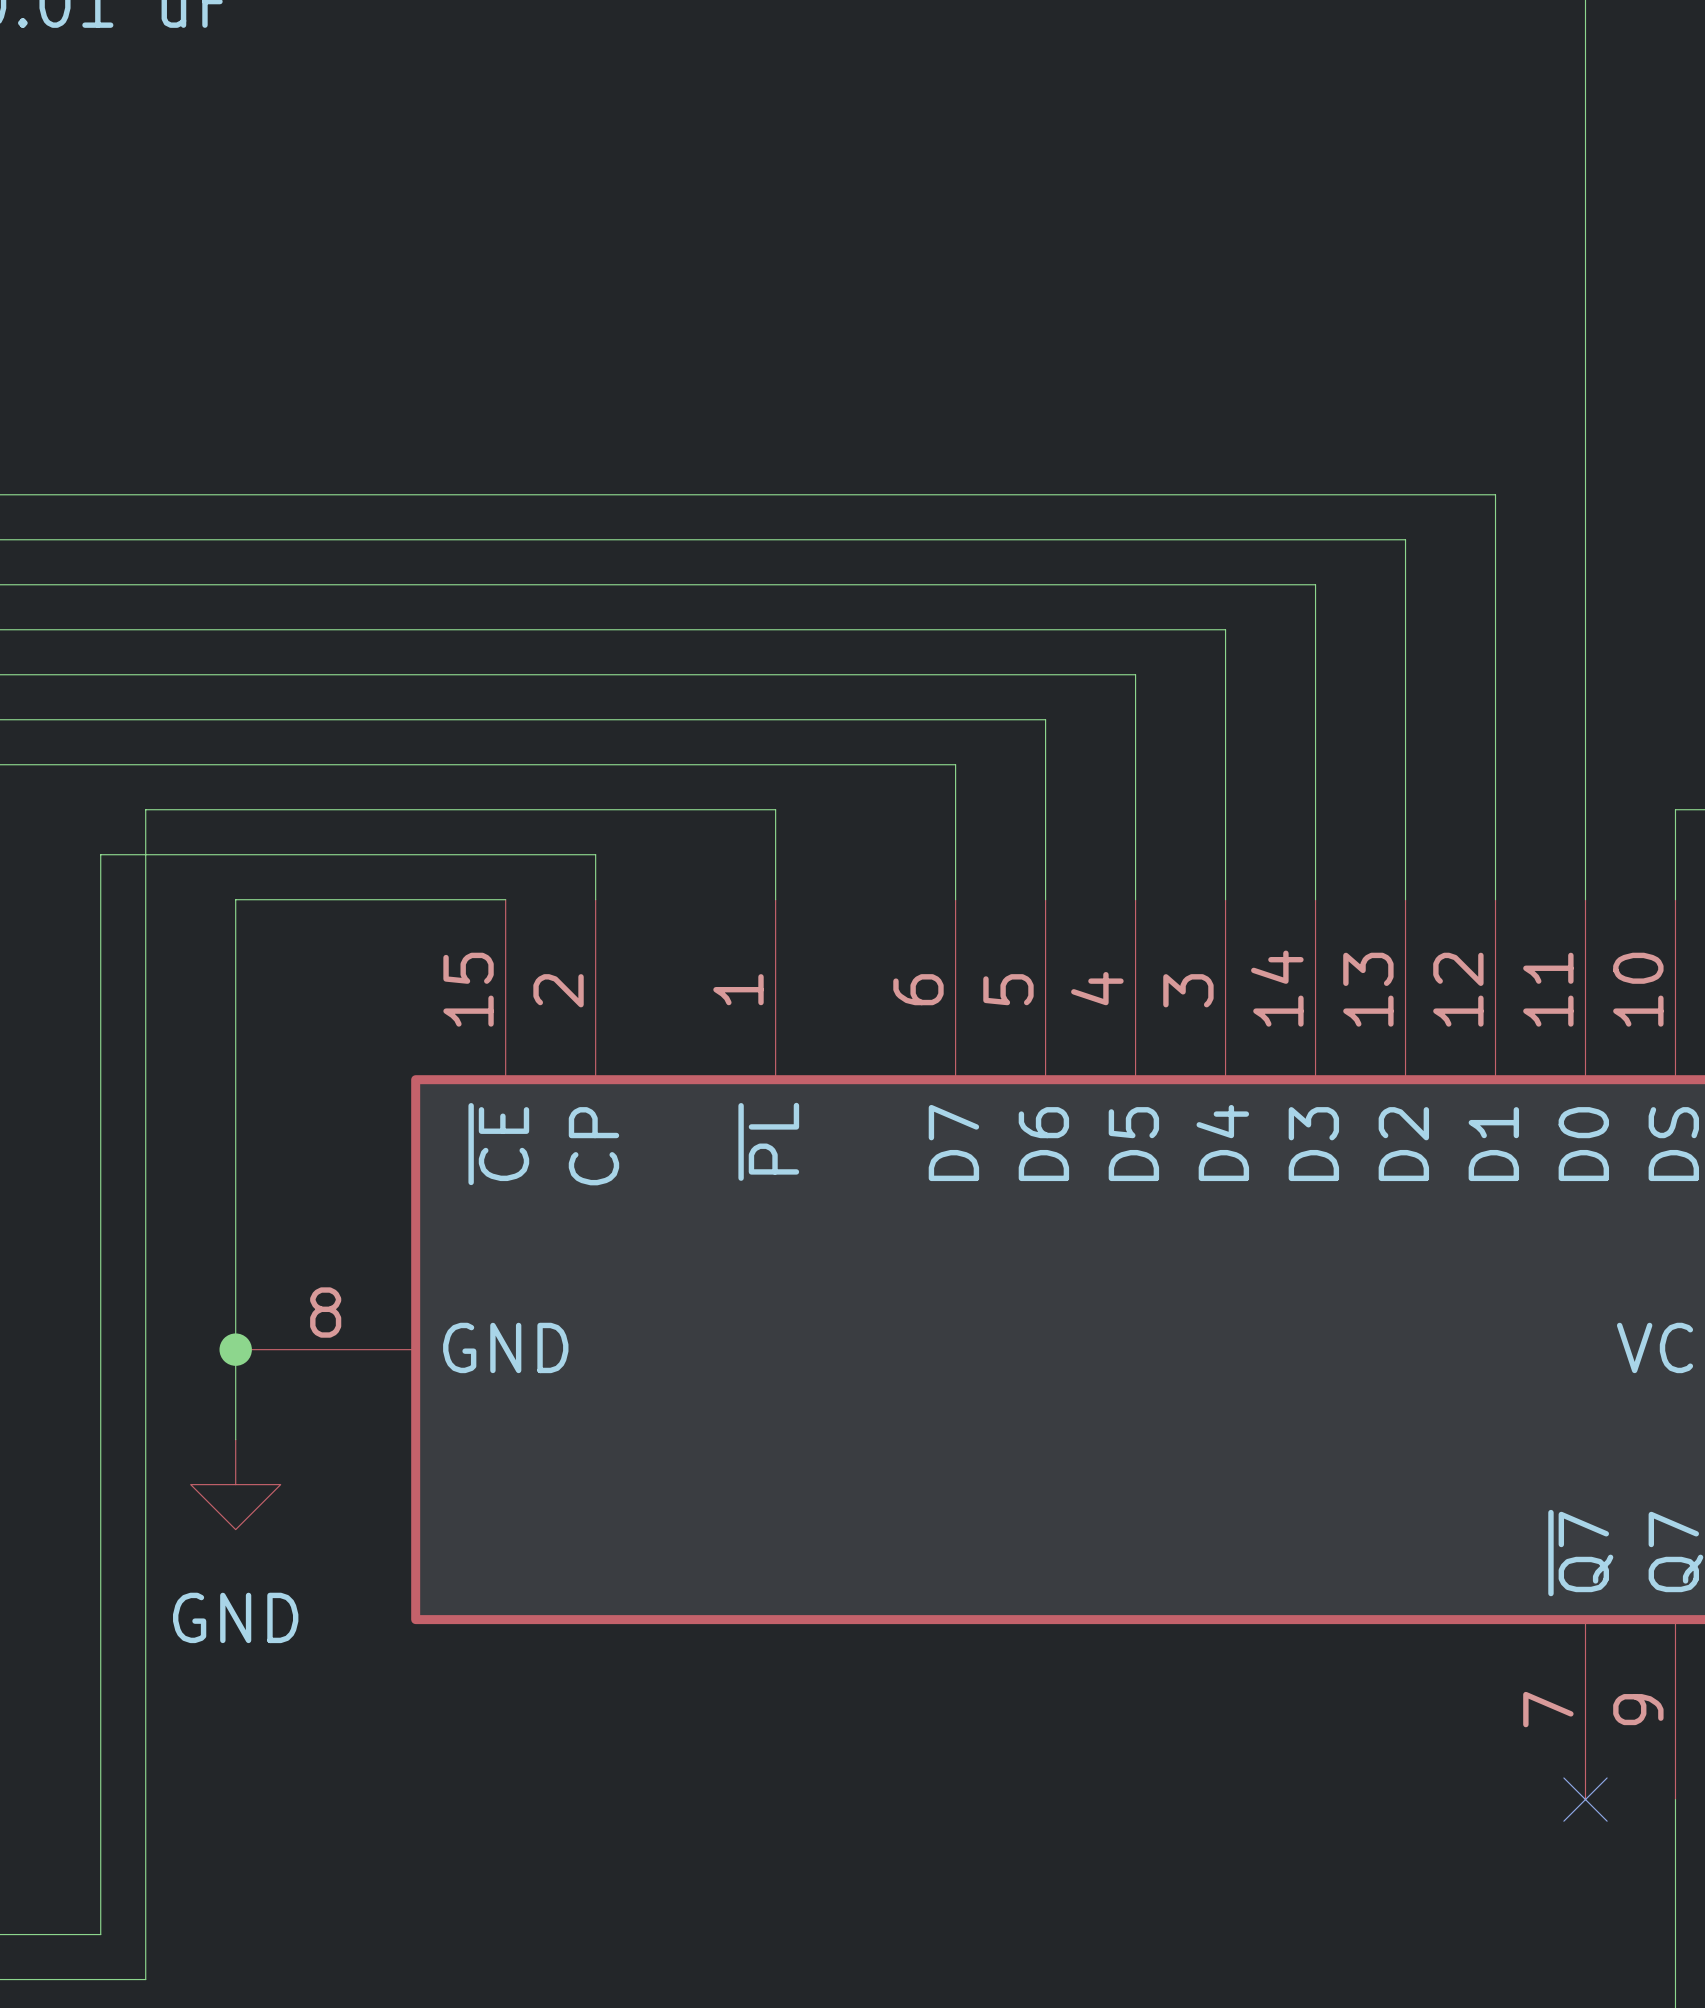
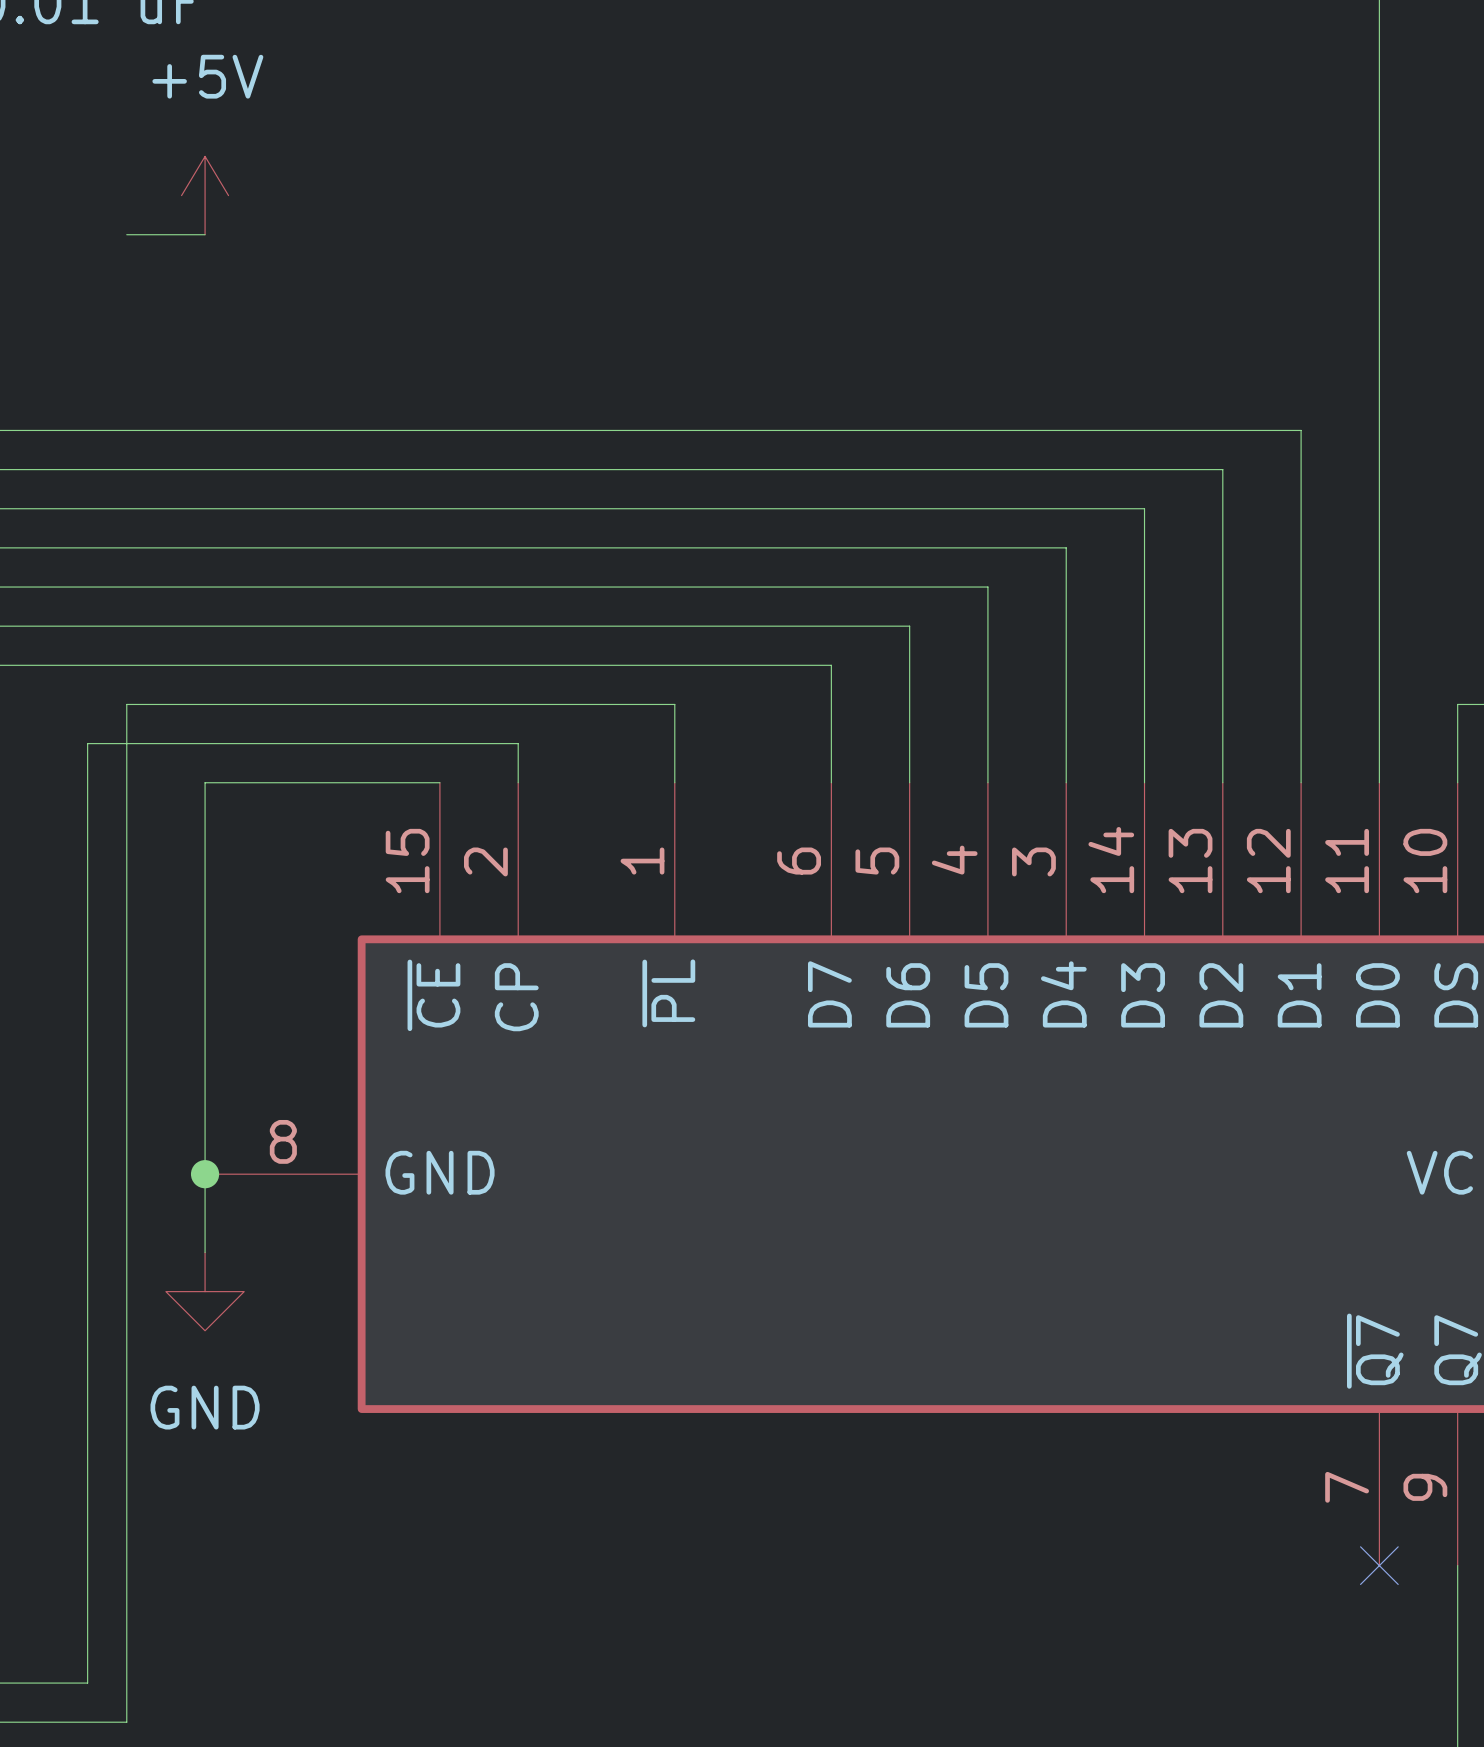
power symbol: none -> +5V (205, 195)
wire: none -> (126, 234) (205, 234)

